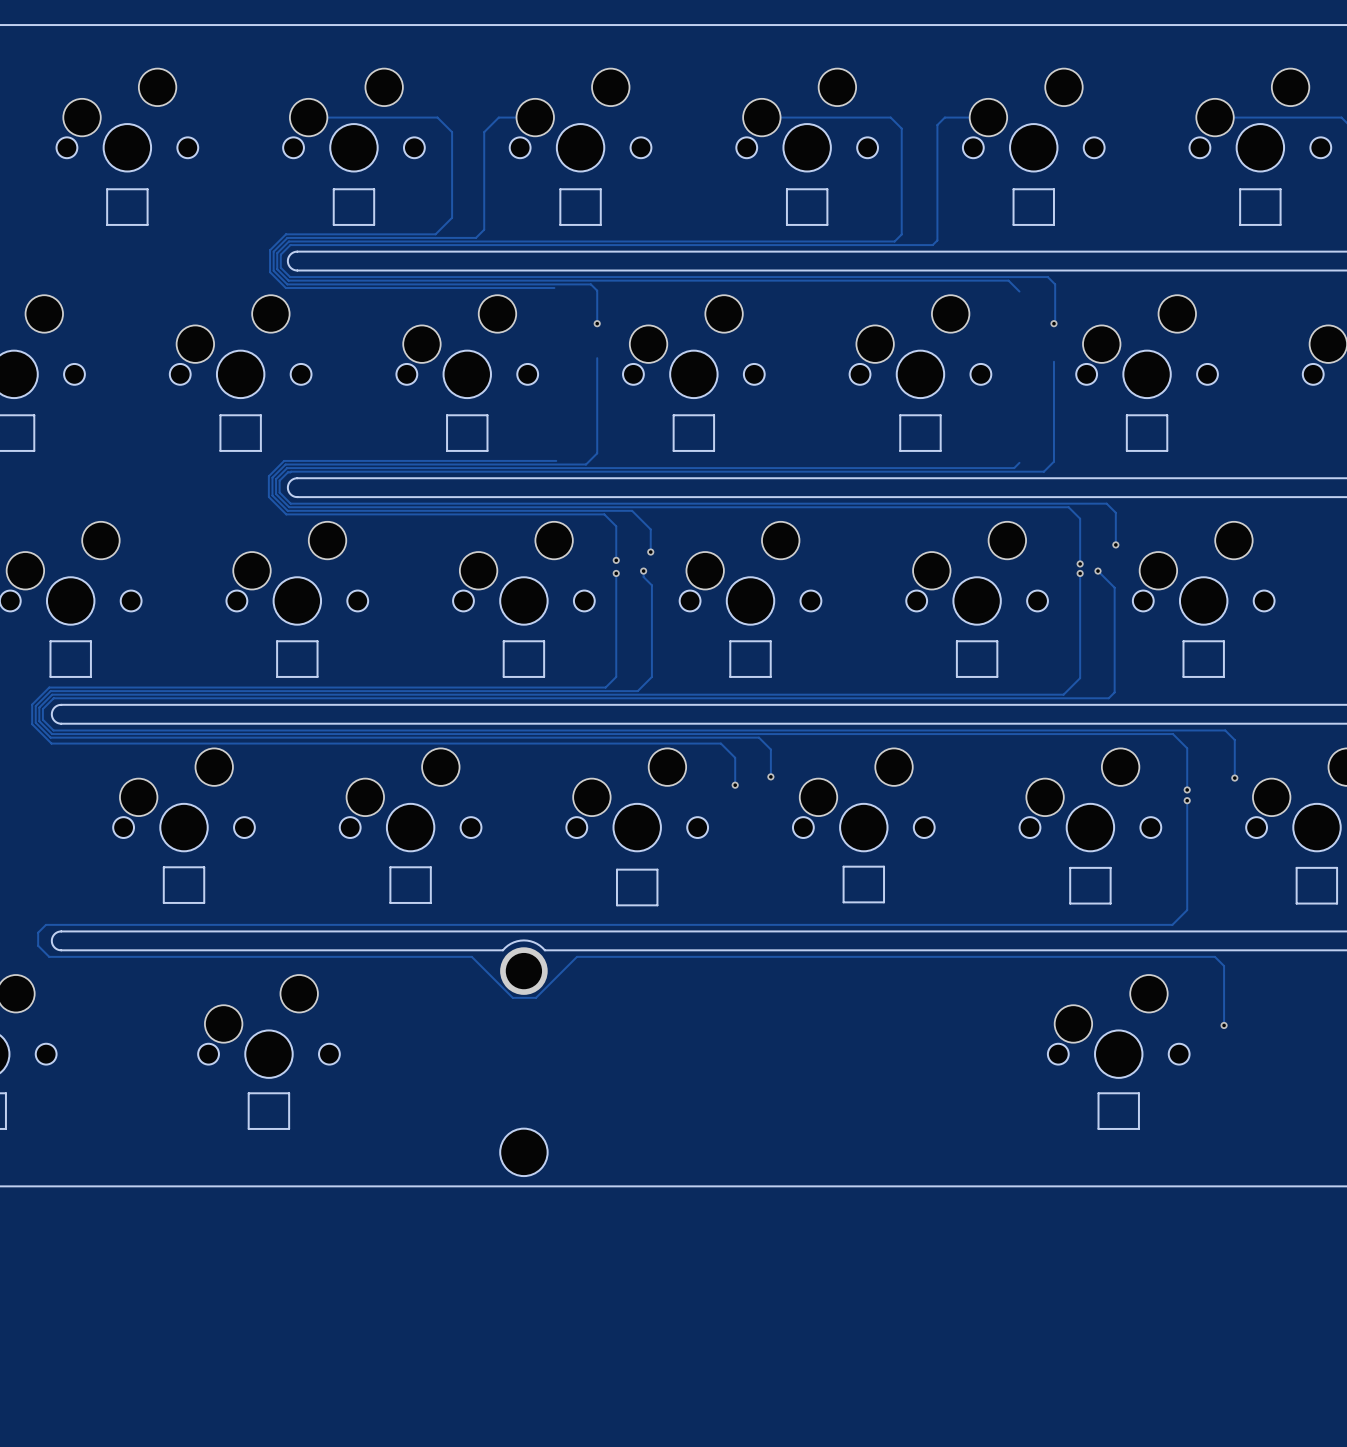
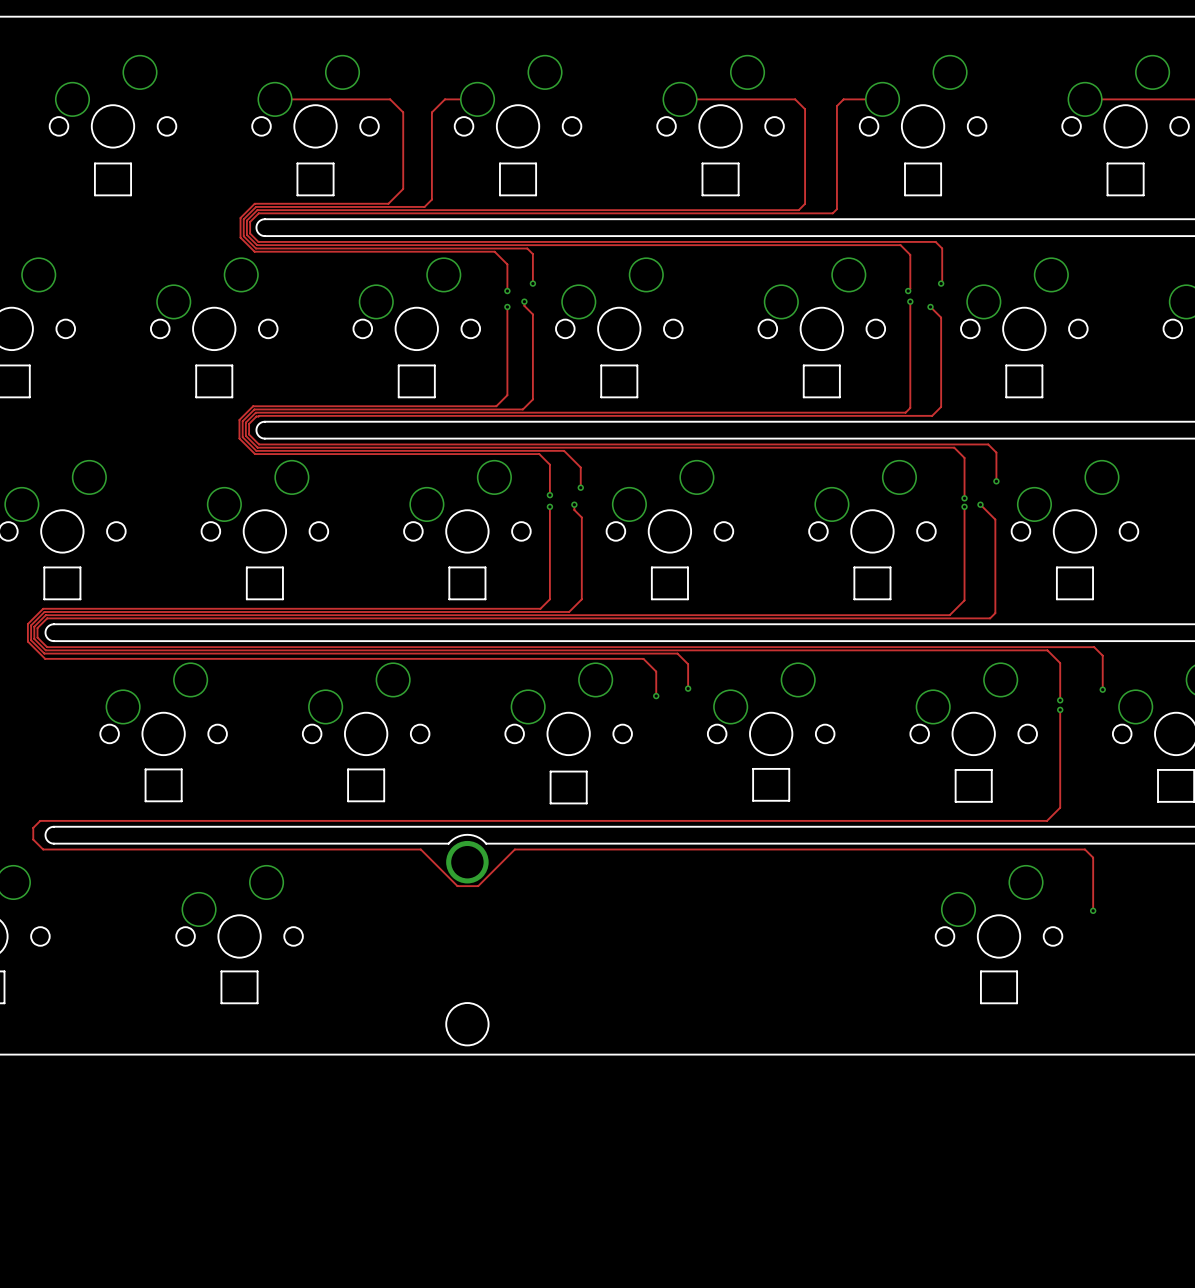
track: none -> (494, 251) (507, 264) (507, 291)
track: none -> (910, 254) (910, 288) (908, 291)
via: none -> (507, 291)
via: none -> (908, 291)
track: none -> (524, 301) (524, 305) (532, 314)
via: none -> (524, 301)
track: none -> (910, 301) (910, 407)
via: none -> (910, 301)
track: none -> (507, 306) (507, 395) (496, 406)
via: none -> (507, 306)
track: none -> (930, 306) (941, 317)
via: none -> (930, 306)

